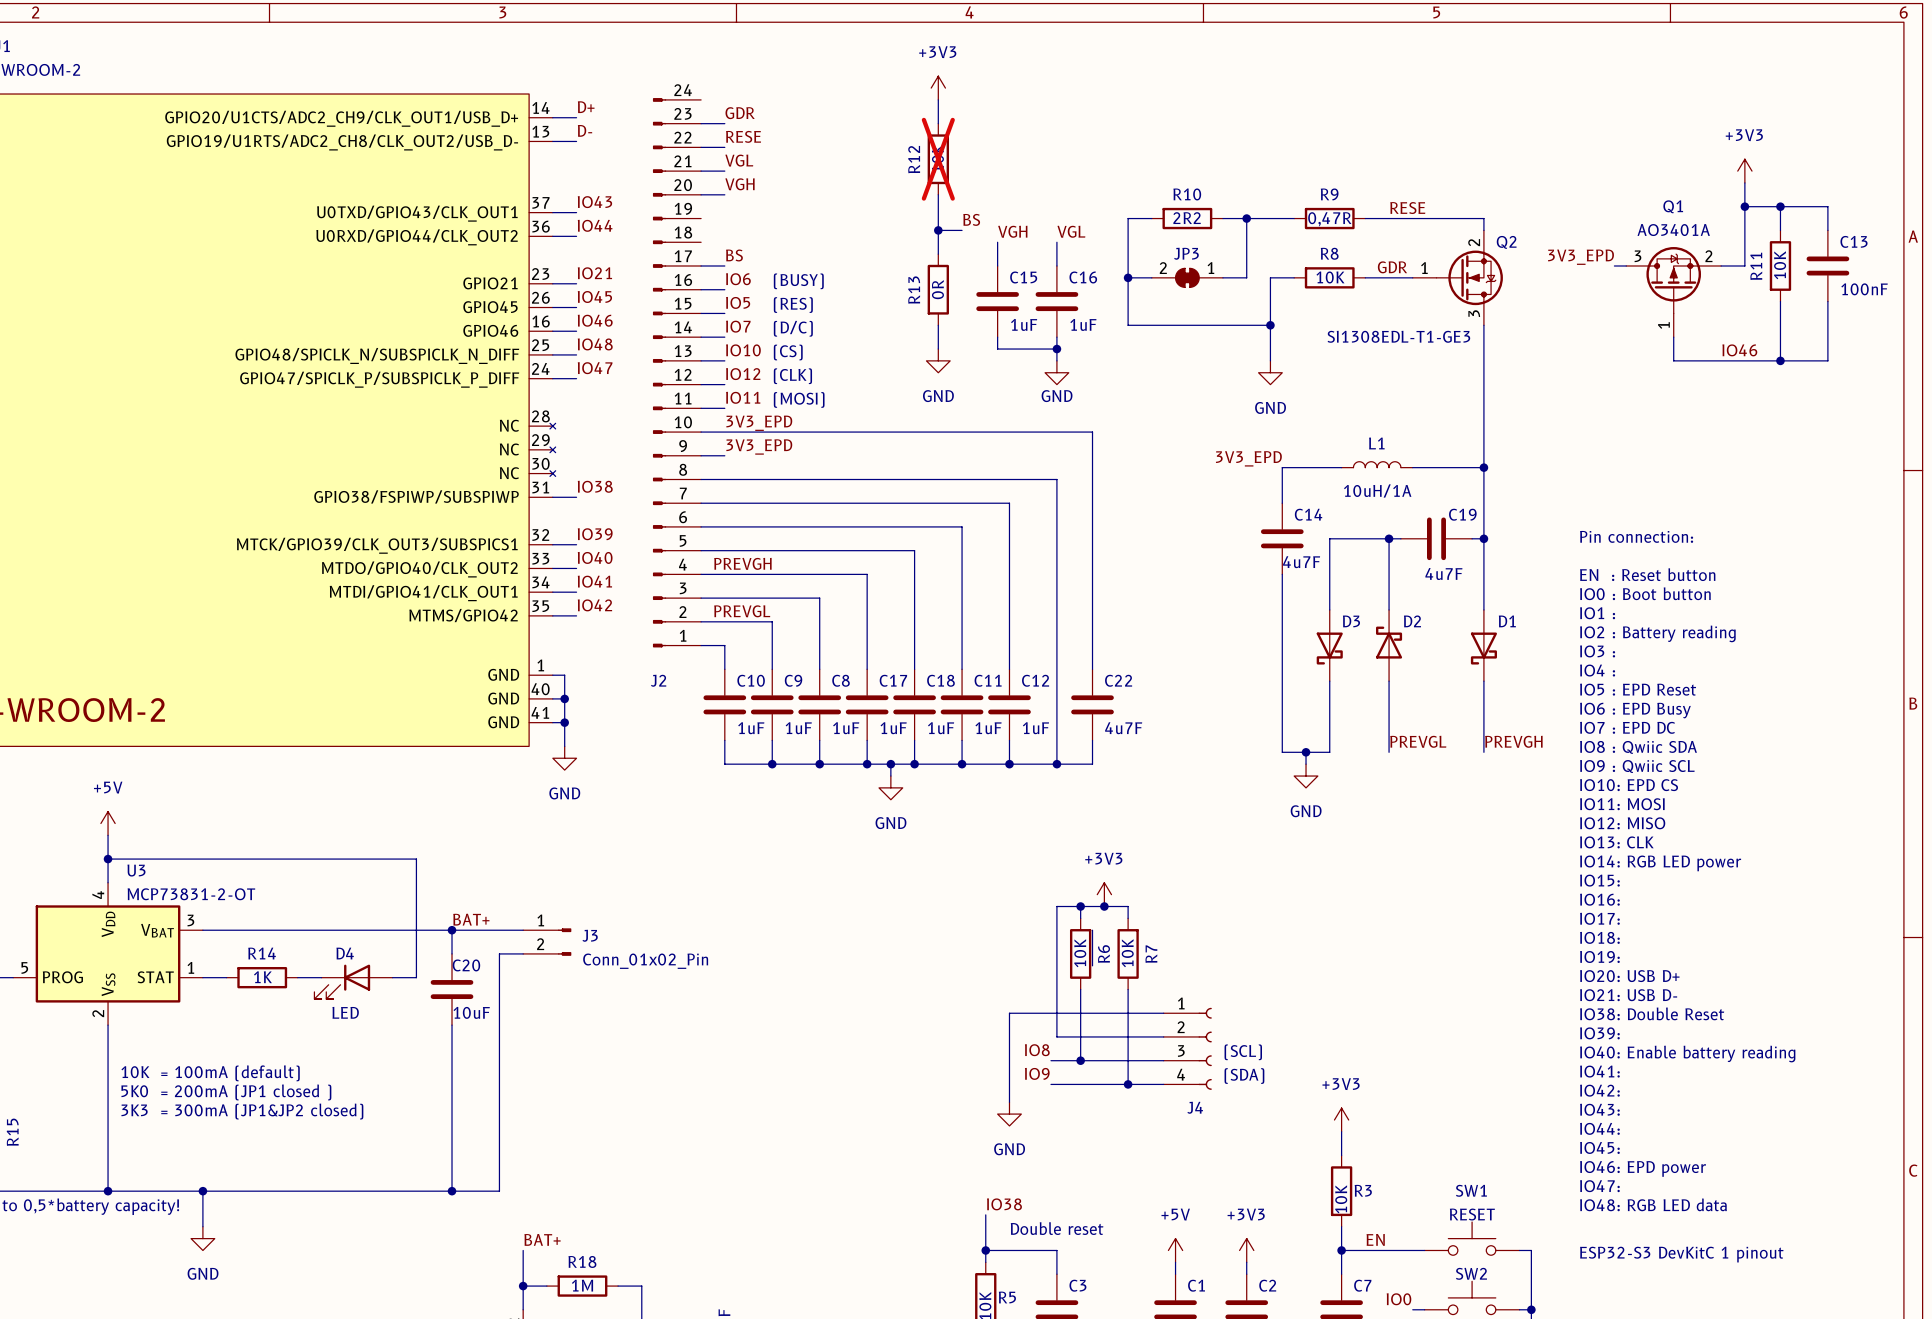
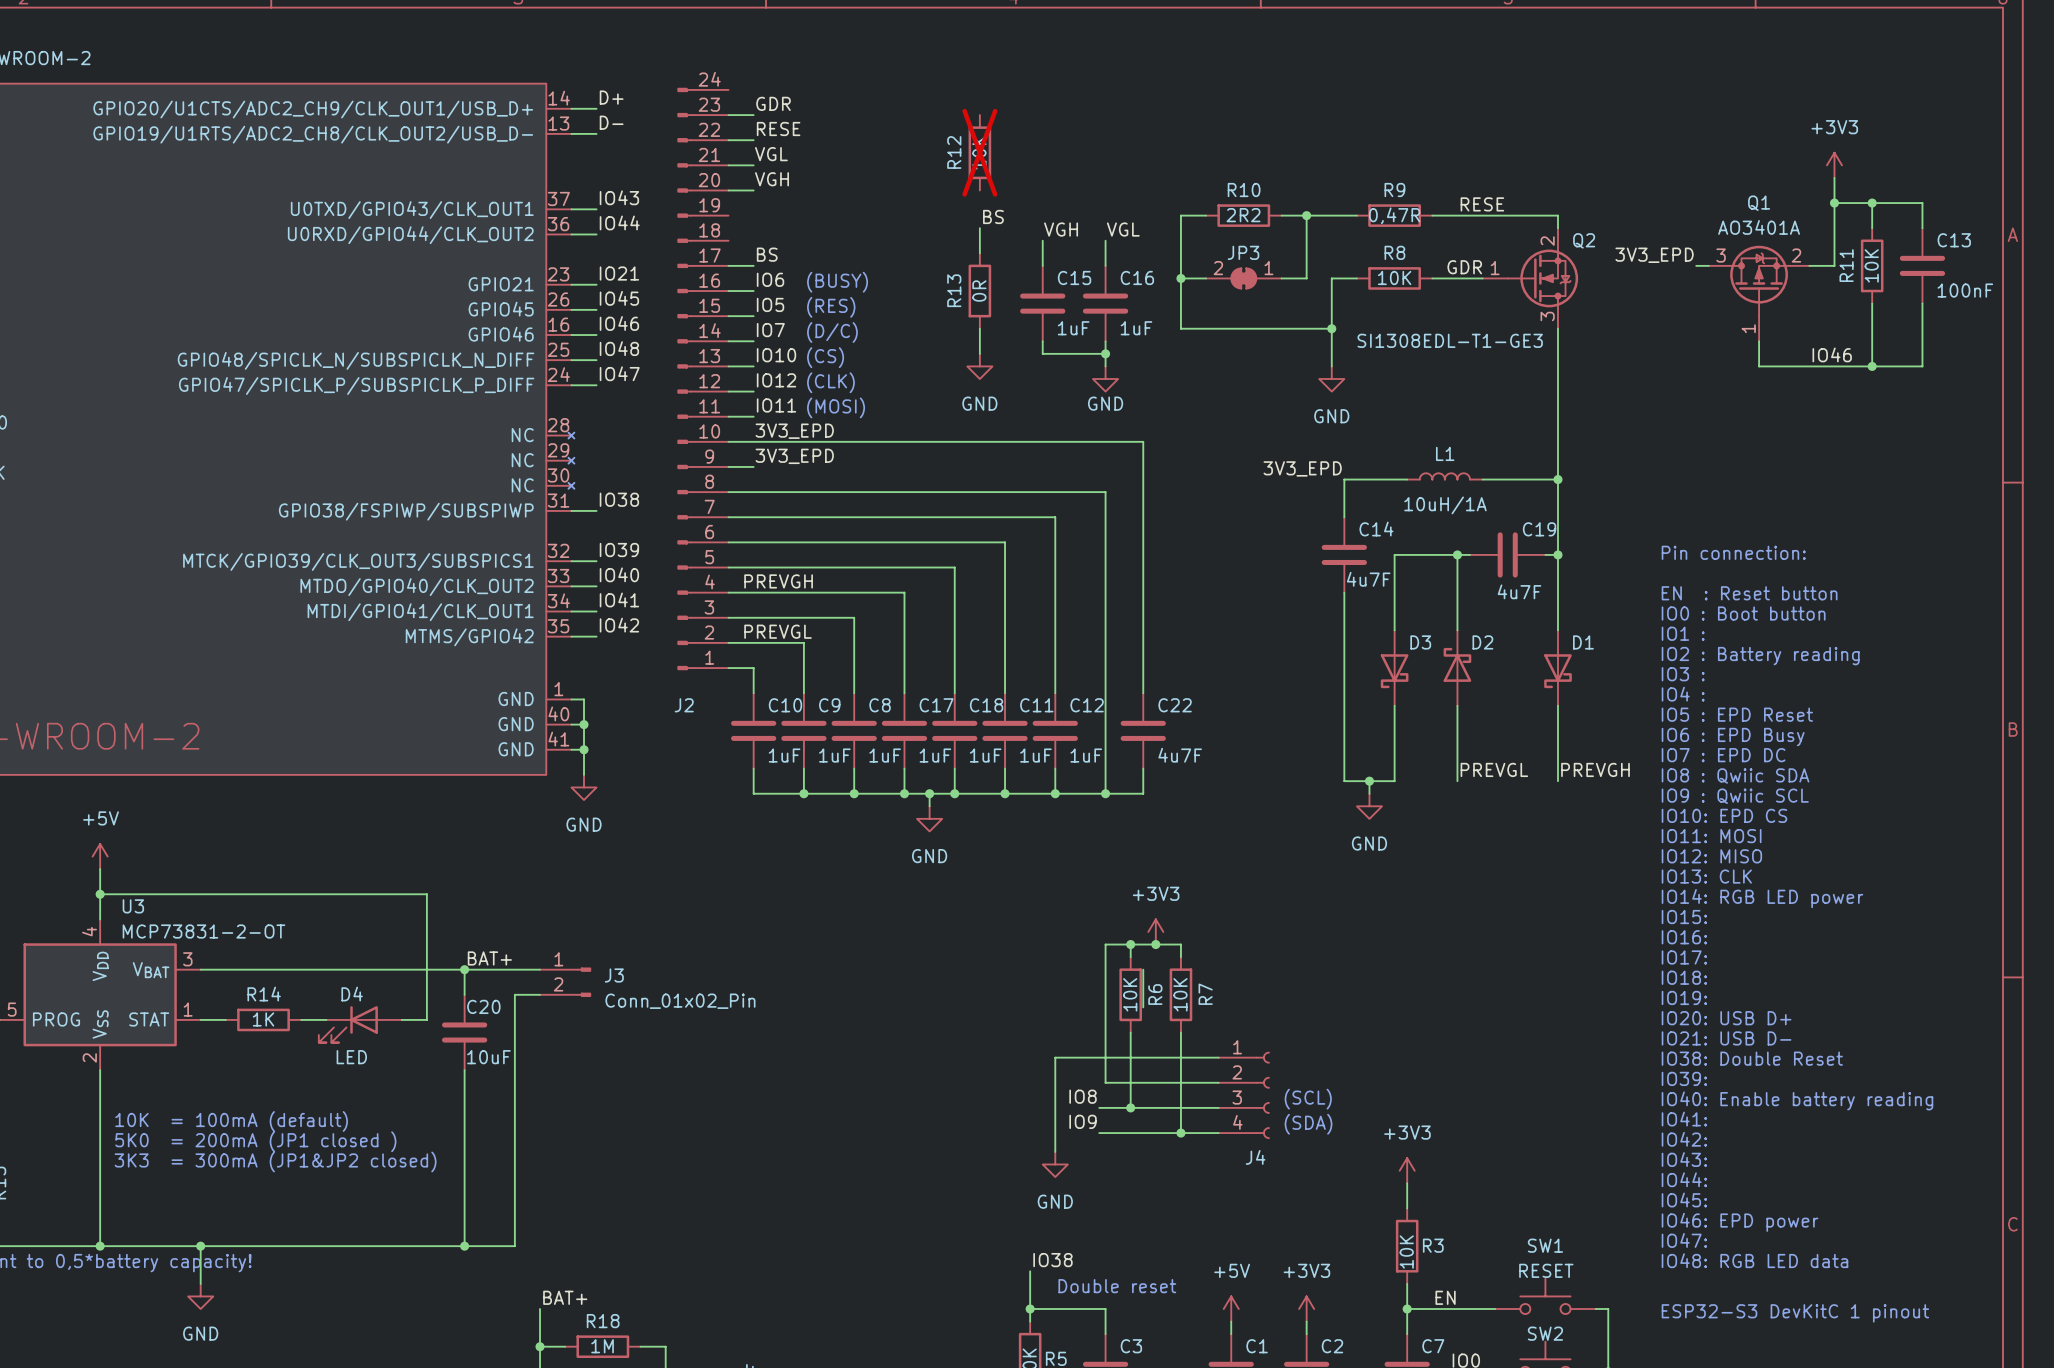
power symbol: +3V3 (938, 88) -> none
wire: (938, 99) (938, 123) -> none
wire: (938, 194) (938, 230) (962, 230) -> none
label position: BS (971, 219) -> BS (993, 216)
junction: (938, 230) -> none

